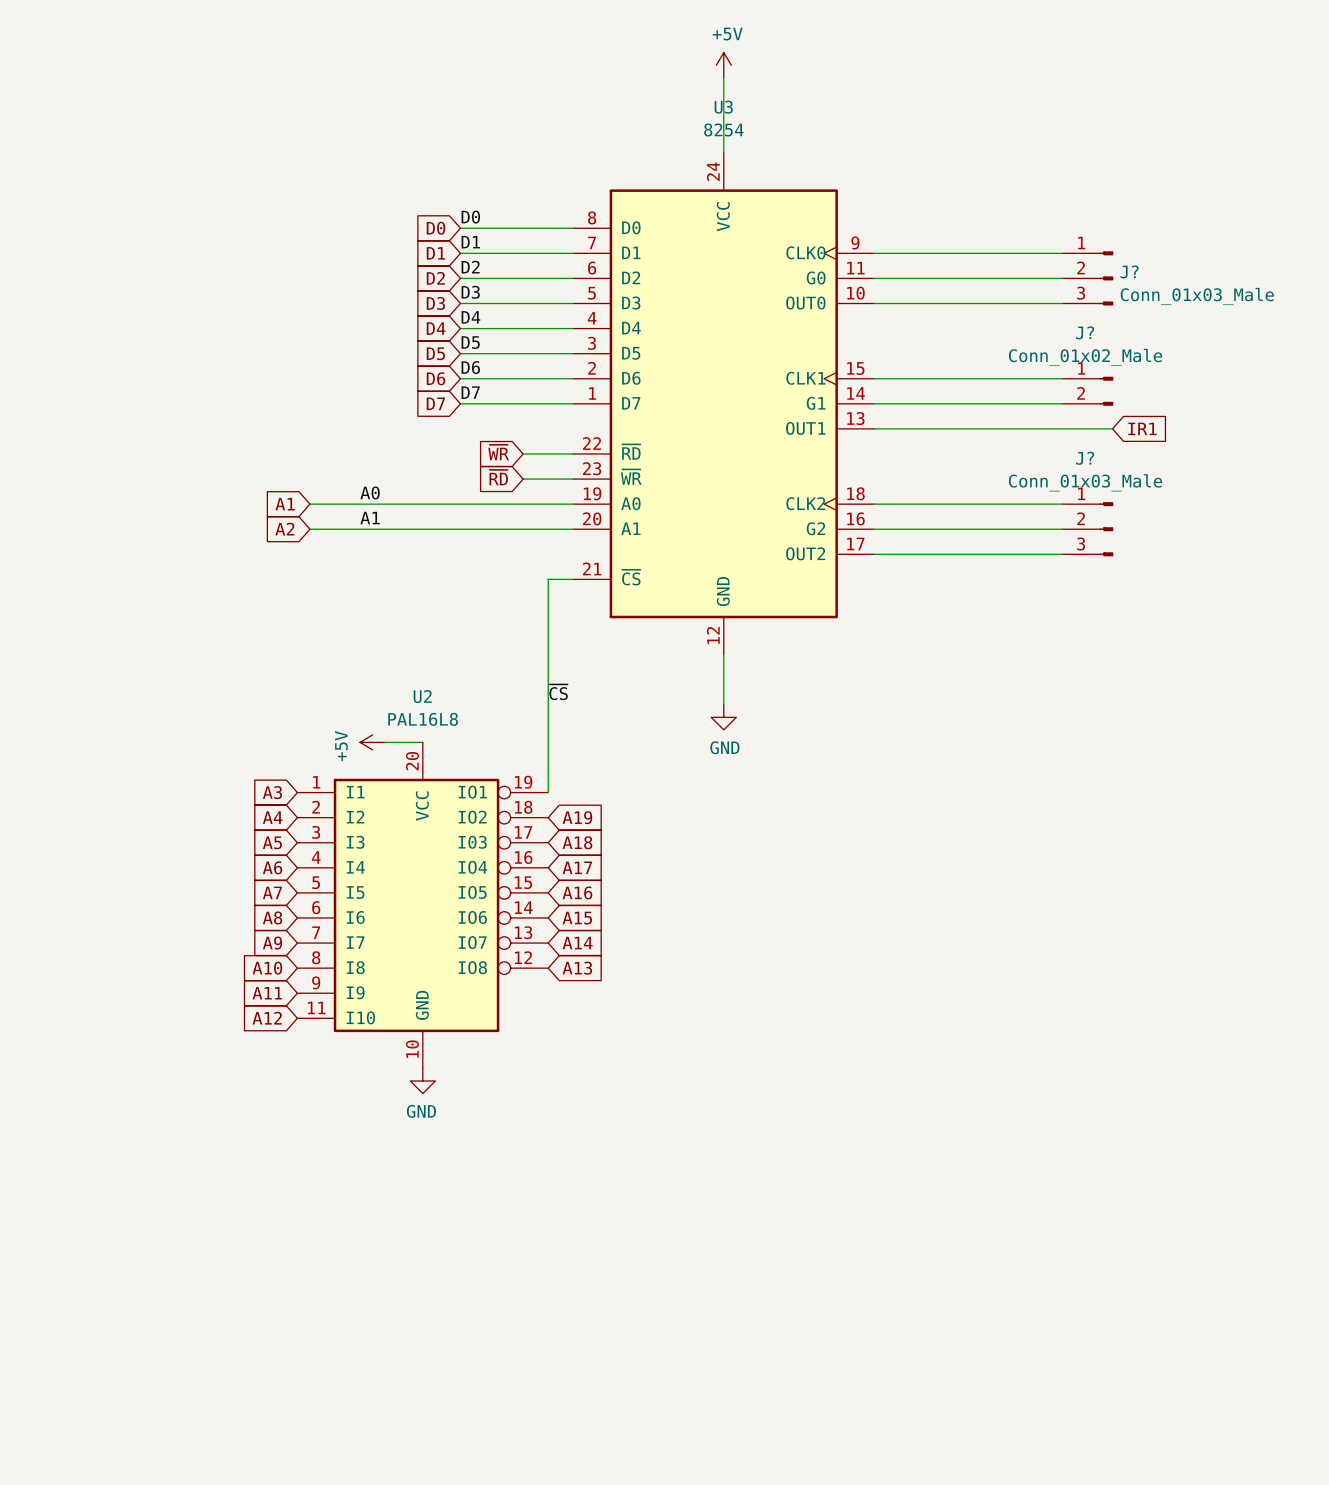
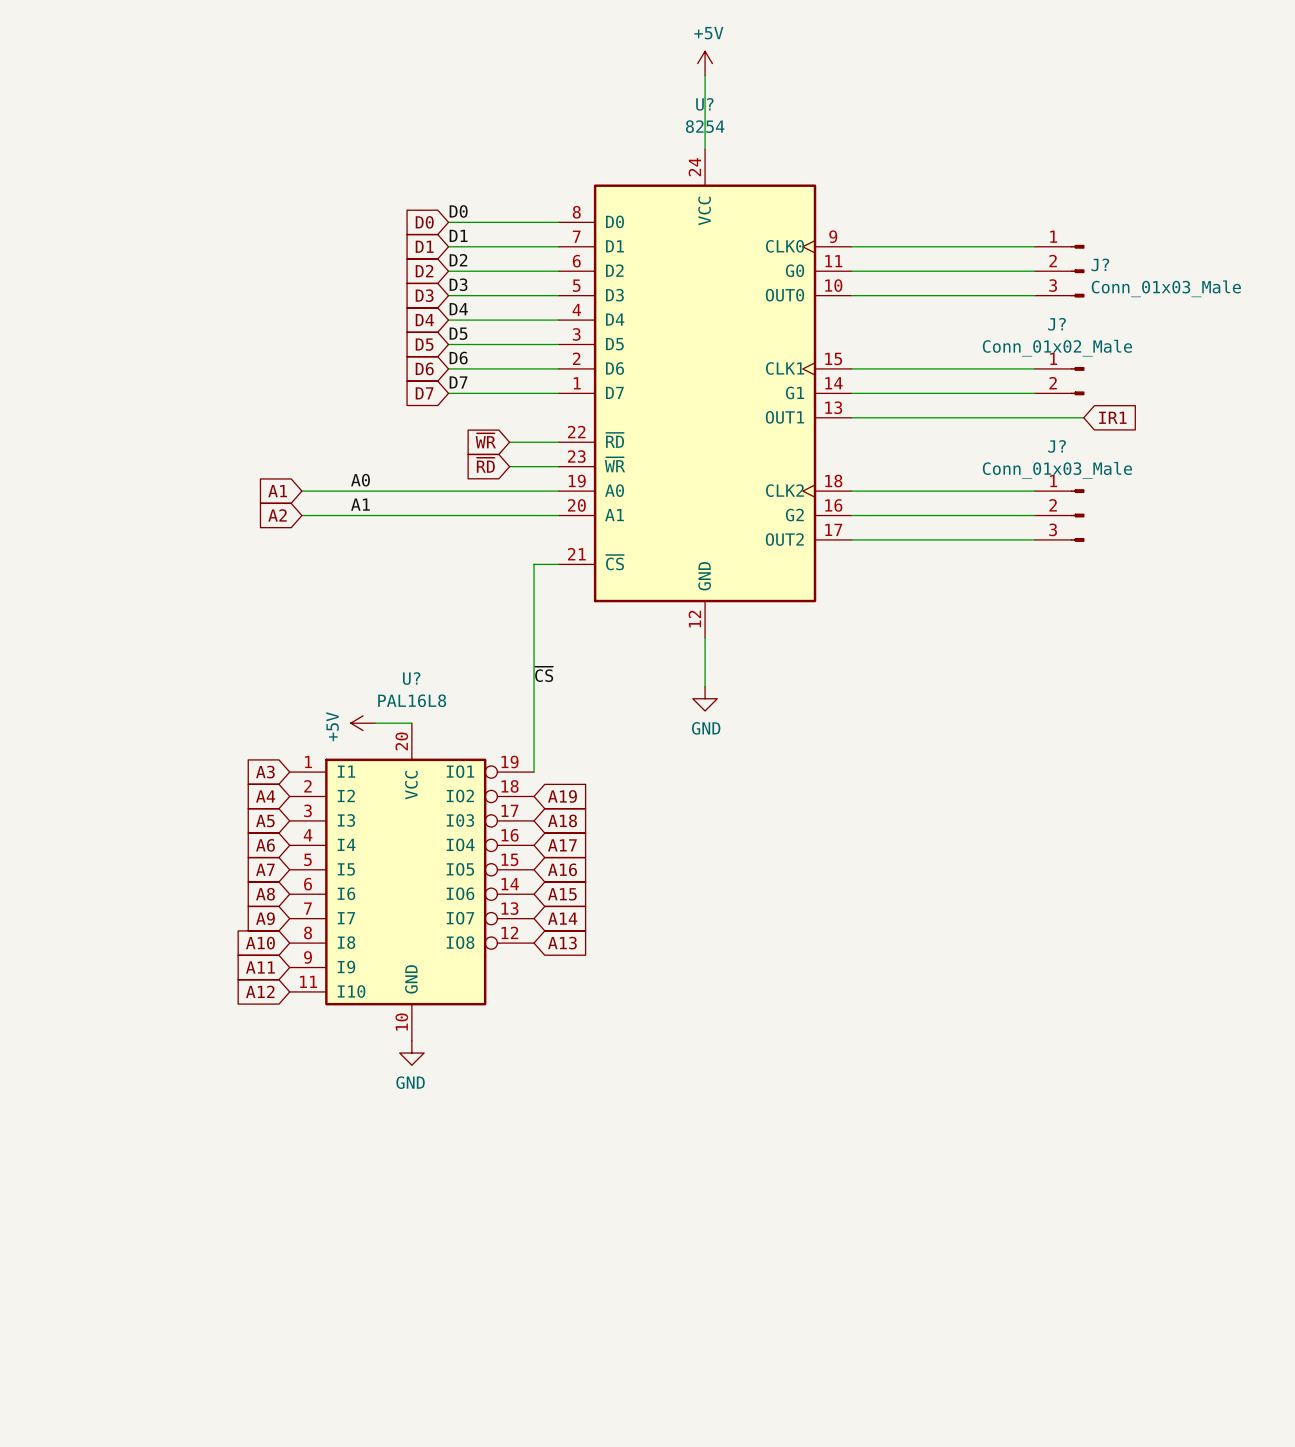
U3 name: U3 (723, 107) -> U? (704, 104)
U2 name: U2 (422, 696) -> U? (411, 678)

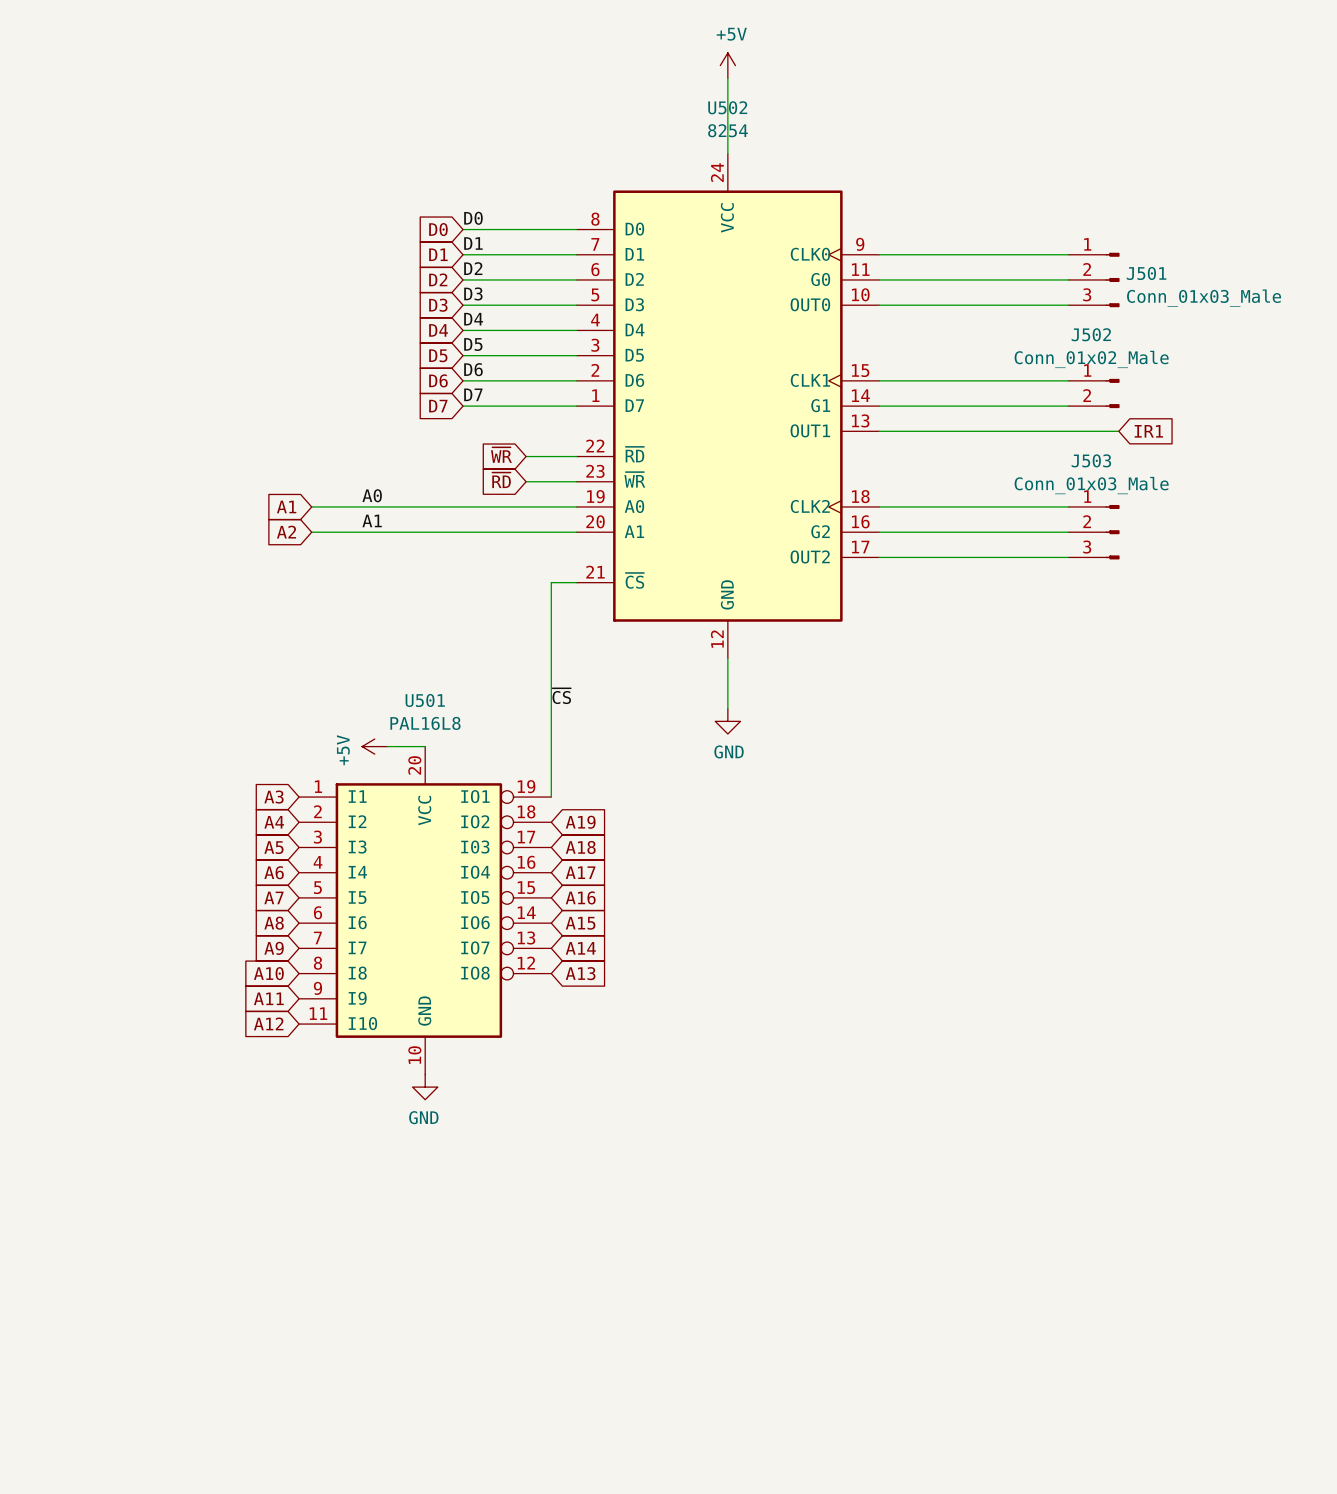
U? name: U? (704, 104) -> U502 (727, 107)
J? name: J? (1100, 264) -> J501 (1146, 273)
J? name: J? (1057, 324) -> J502 (1091, 334)
J? name: J? (1057, 446) -> J503 (1091, 460)
U? name: U? (411, 678) -> U501 (425, 700)

